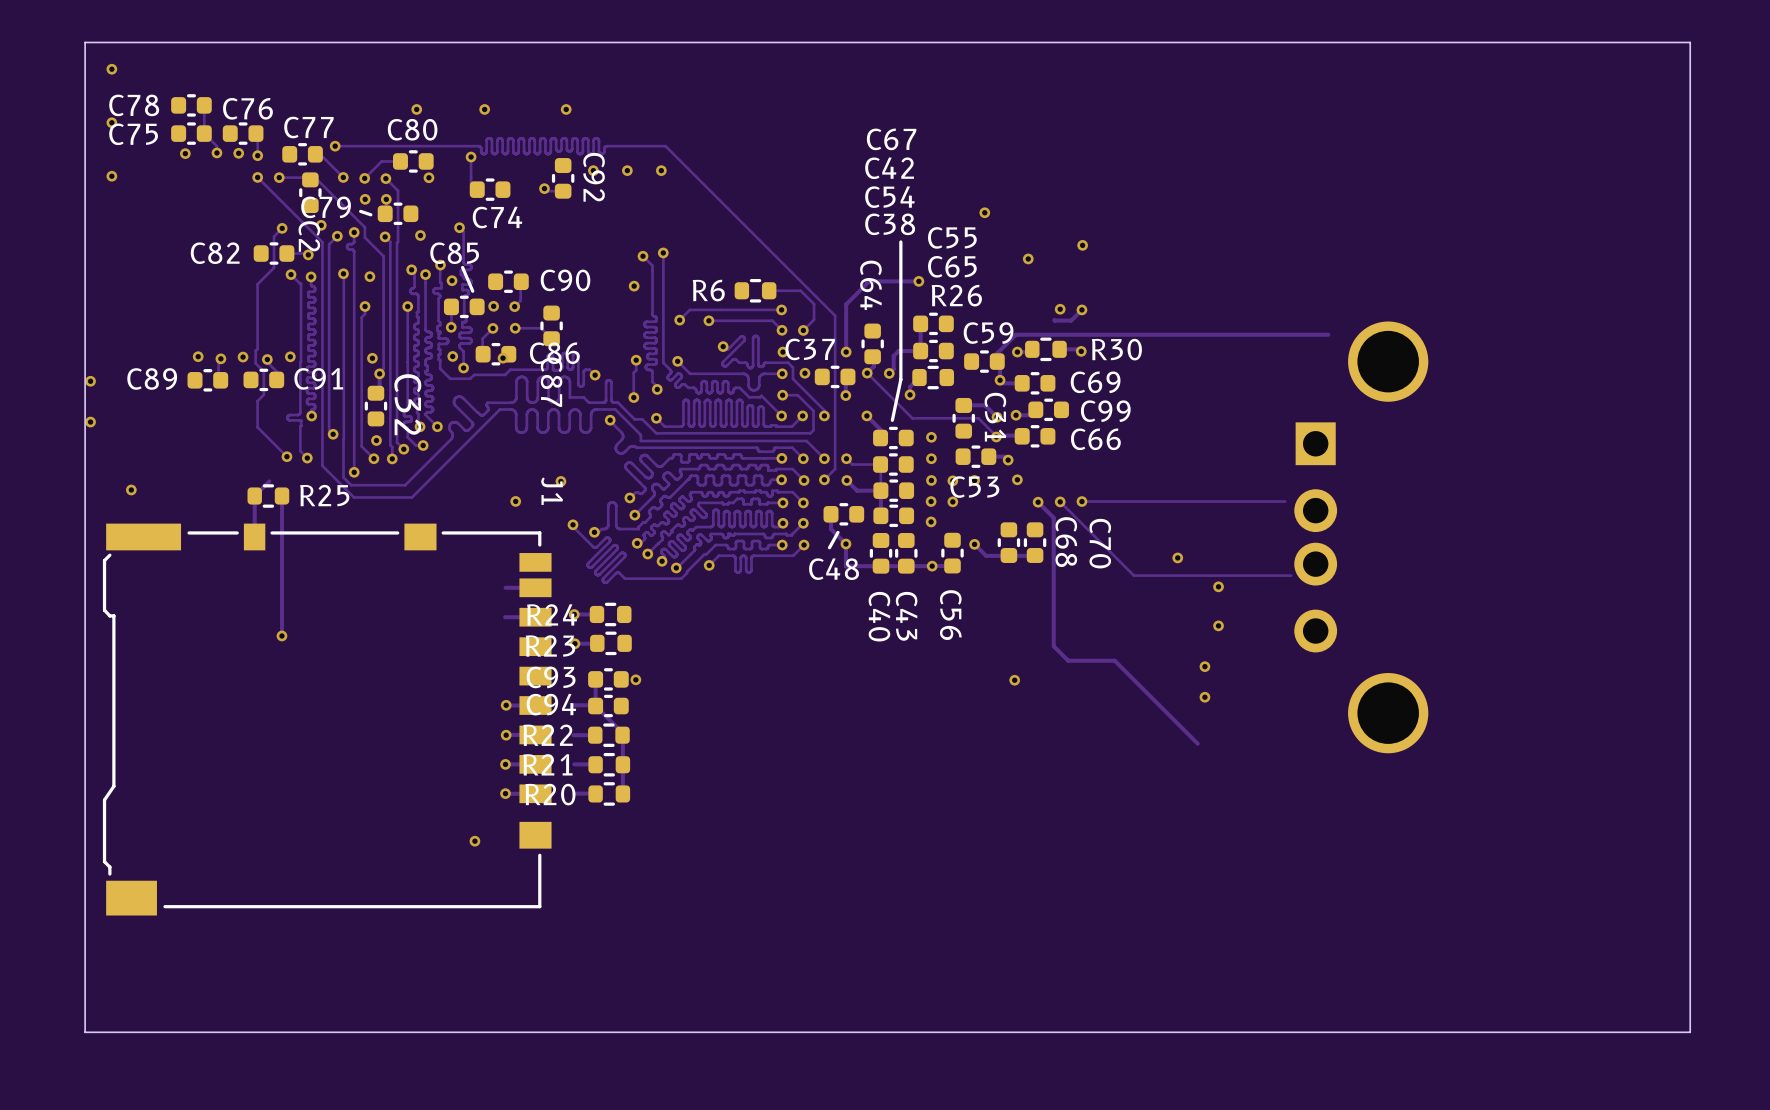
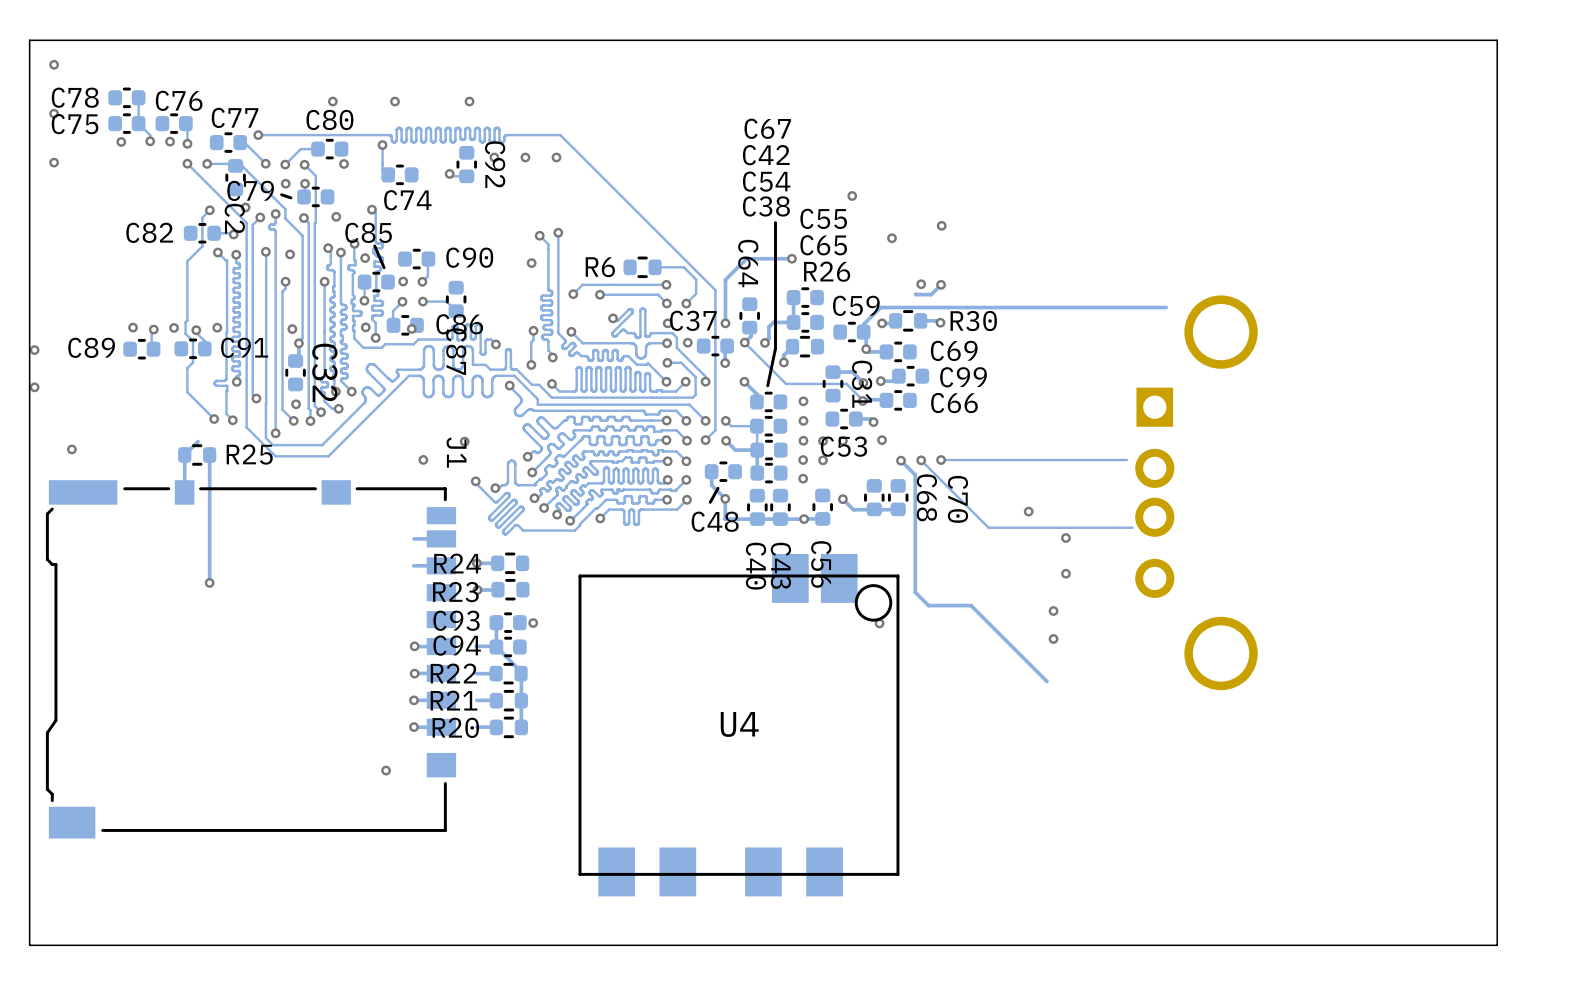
U4: none -> (738, 725)

